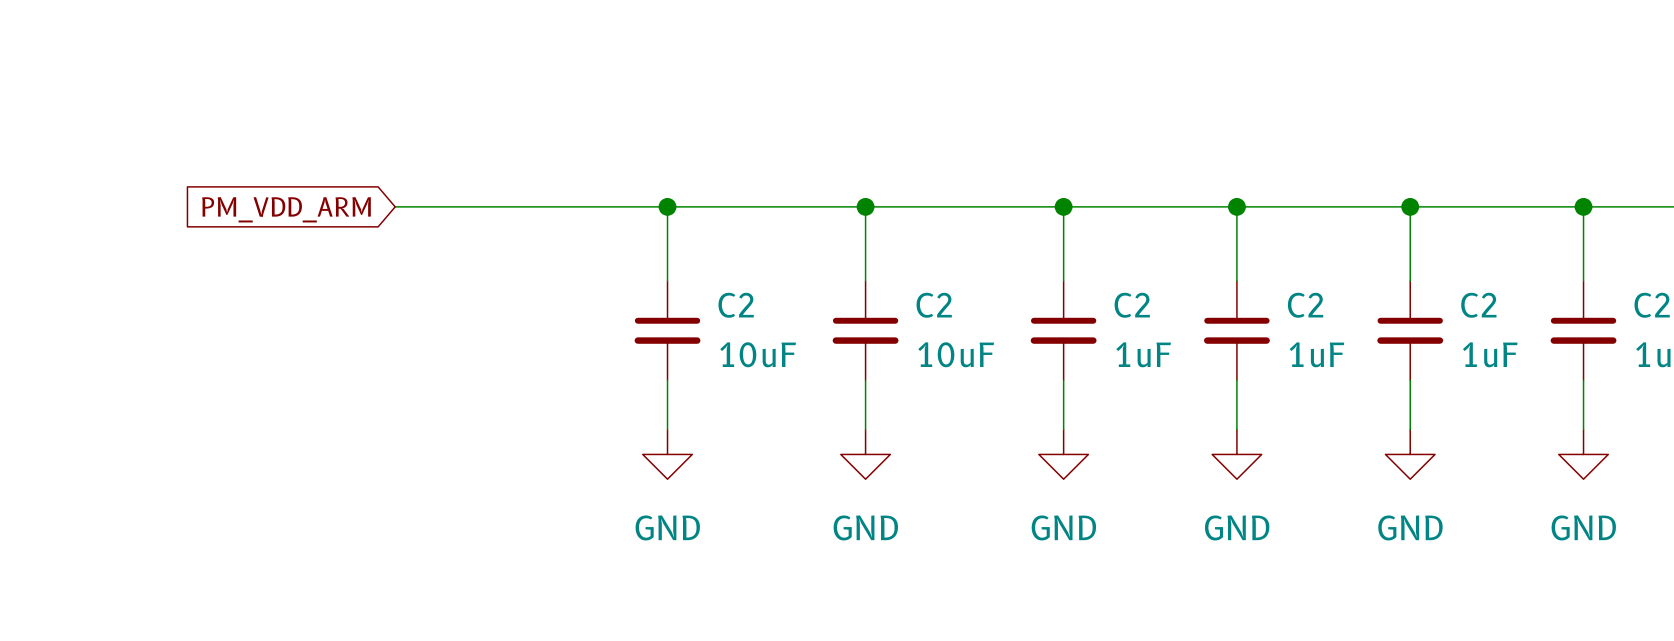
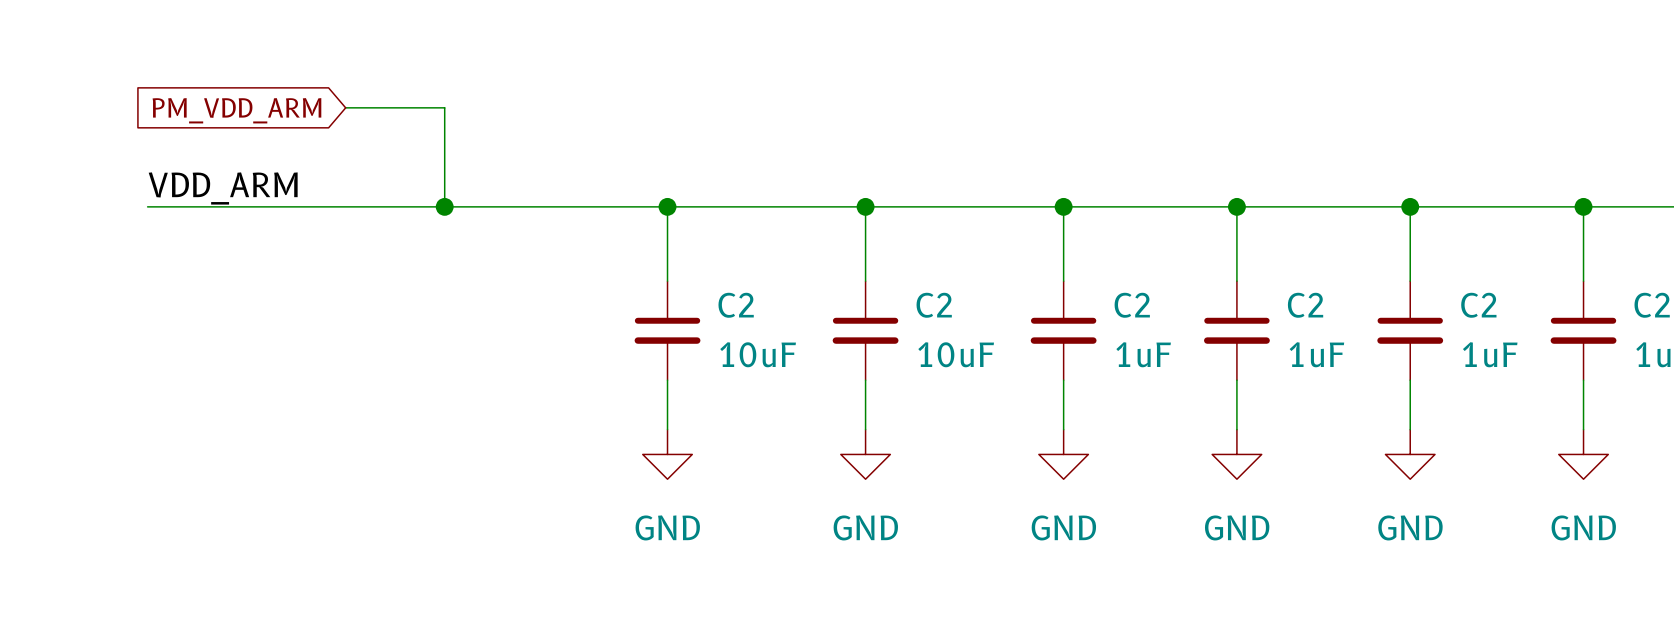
wire: none -> (345, 107) (444, 107) (444, 206)
label: none -> VDD_ARM (223, 188)
wire: none -> (147, 206) (395, 206)
junction: none -> (444, 206)
global label position: PM_VDD_ARM (286, 209) -> PM_VDD_ARM (236, 110)

